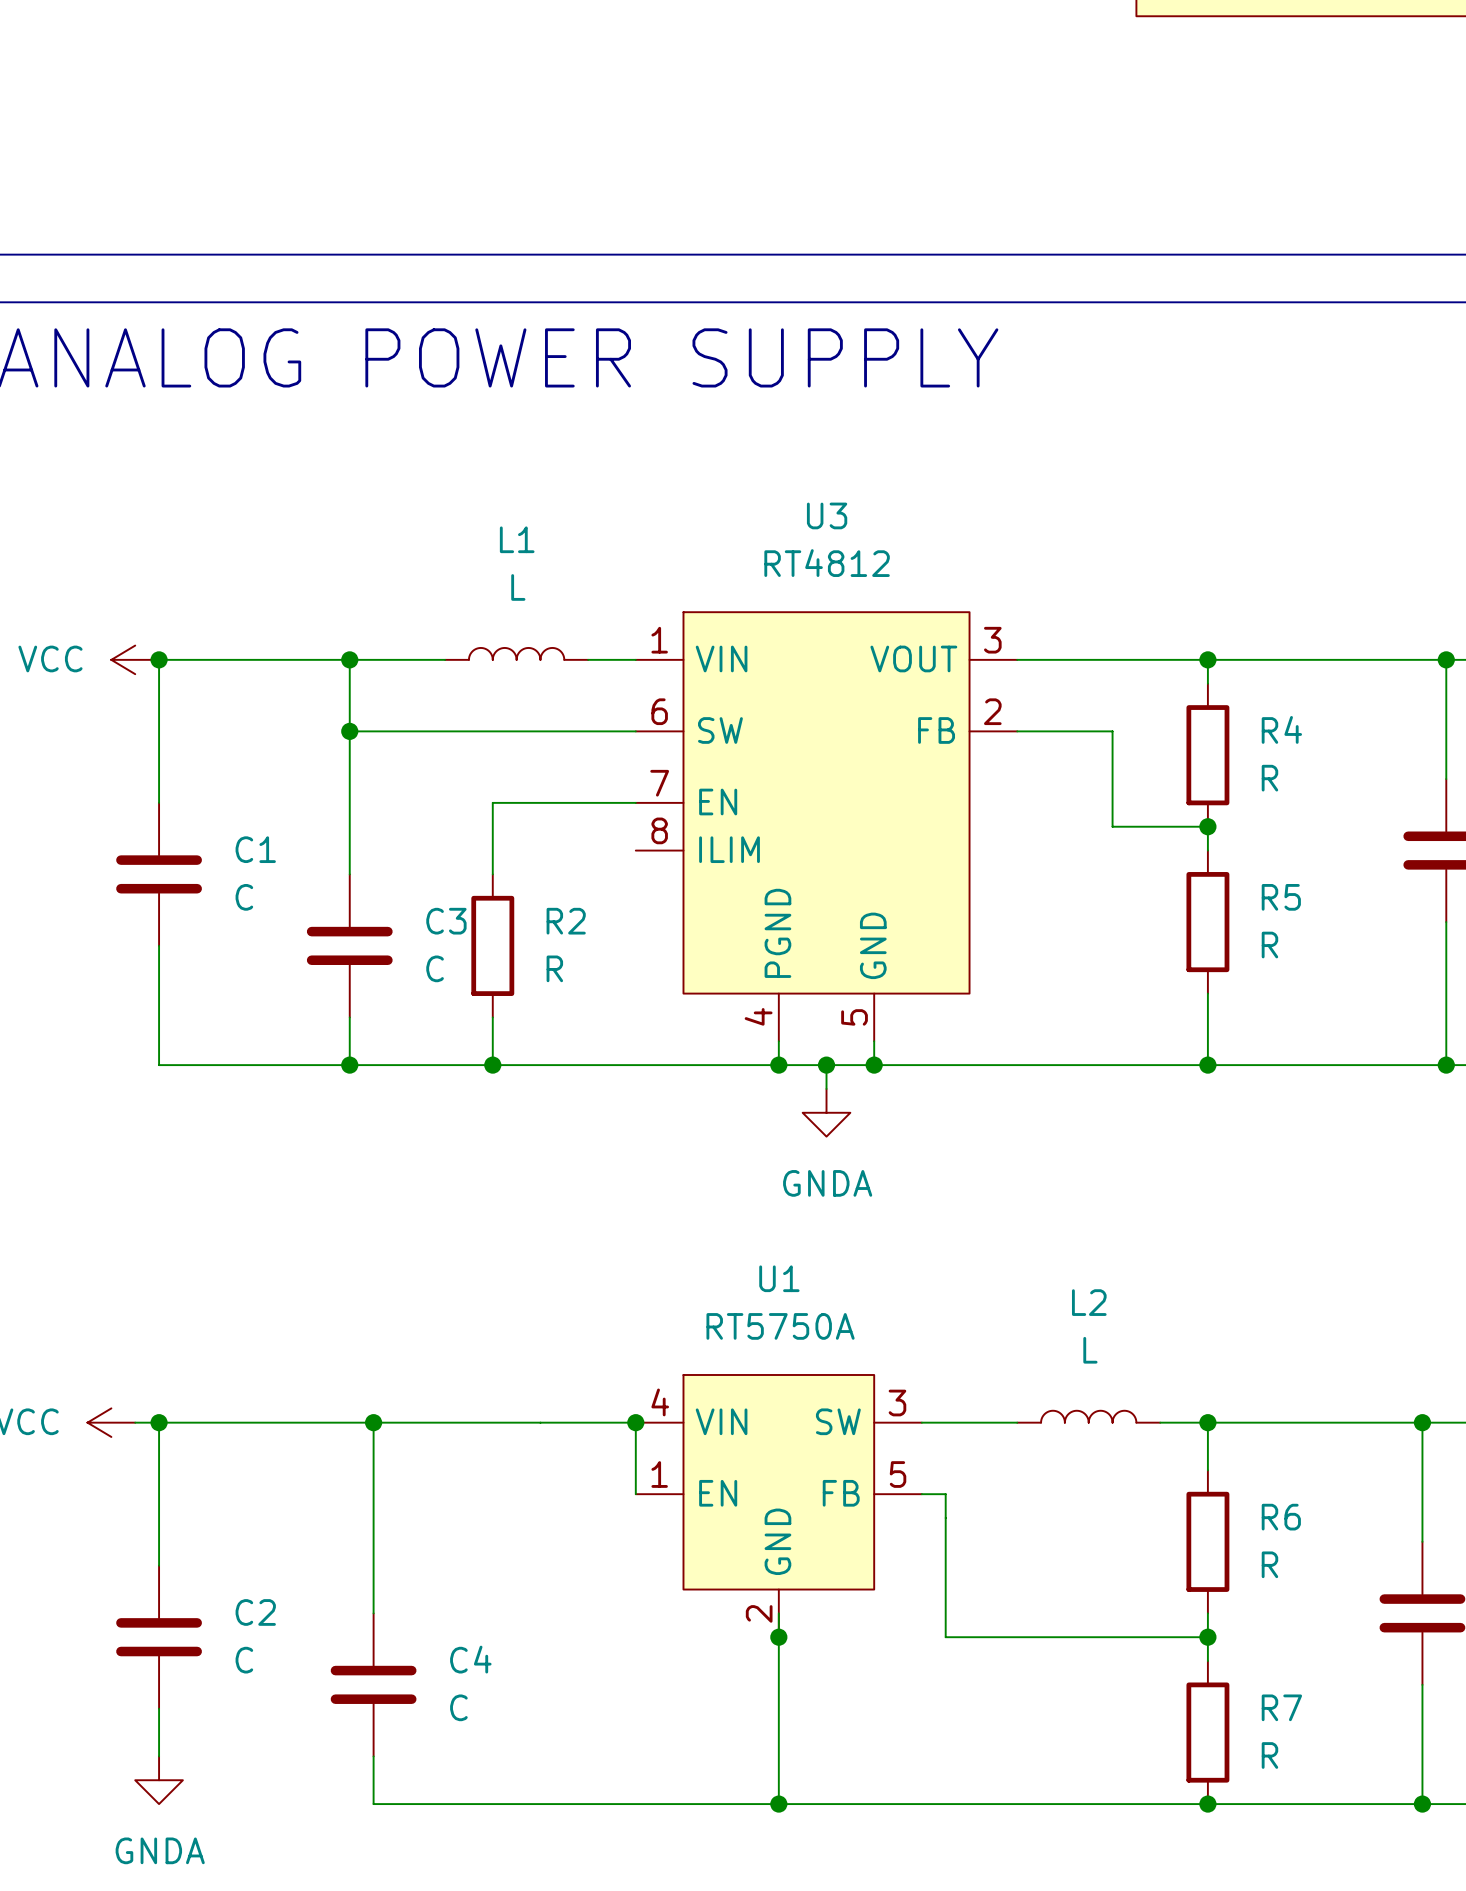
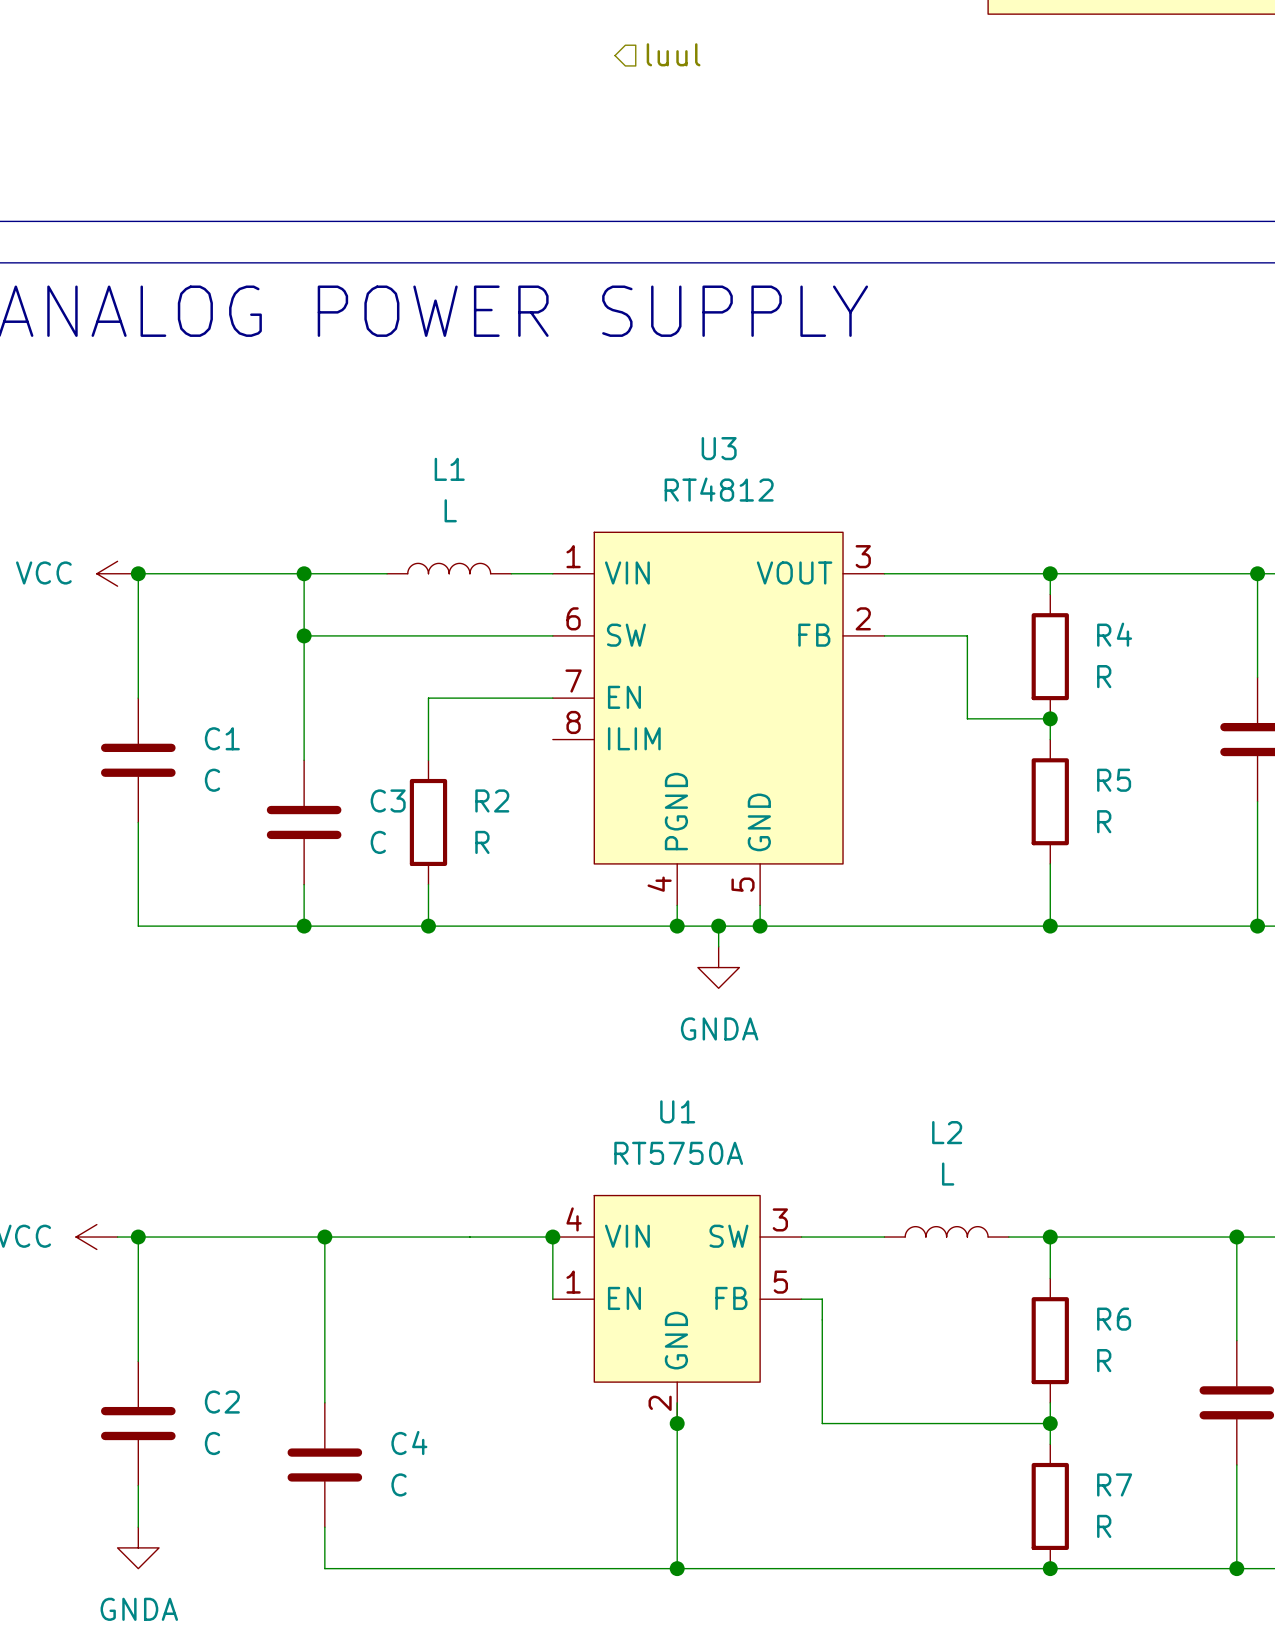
hierarchical label: none -> luul (673, 54)

